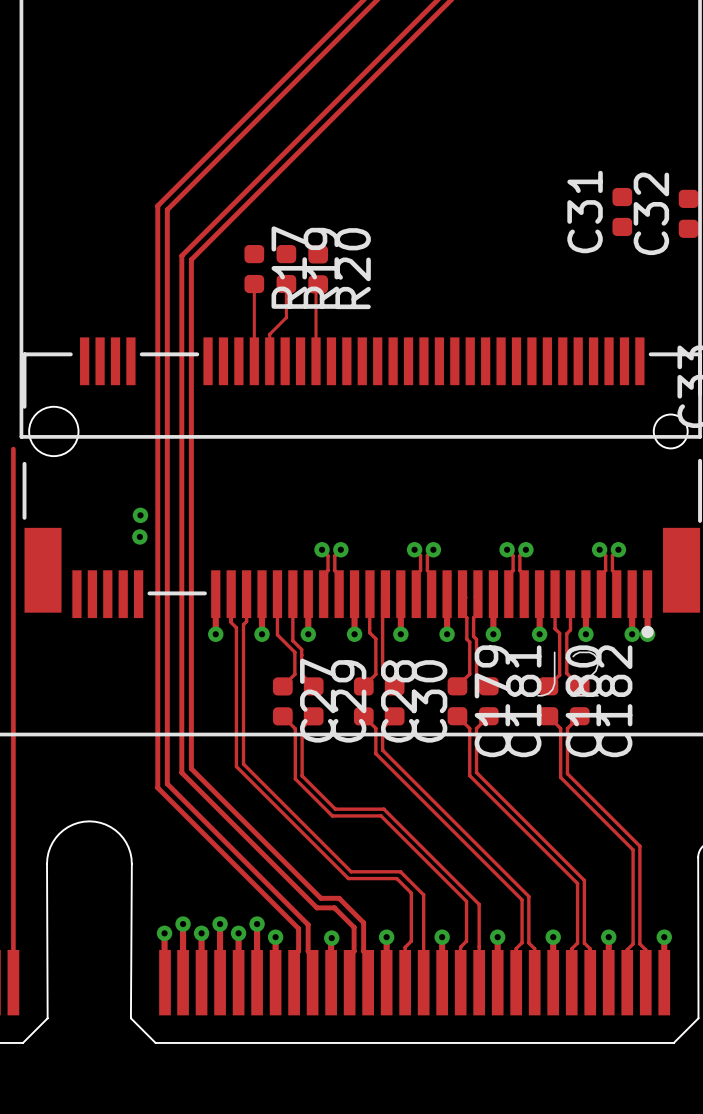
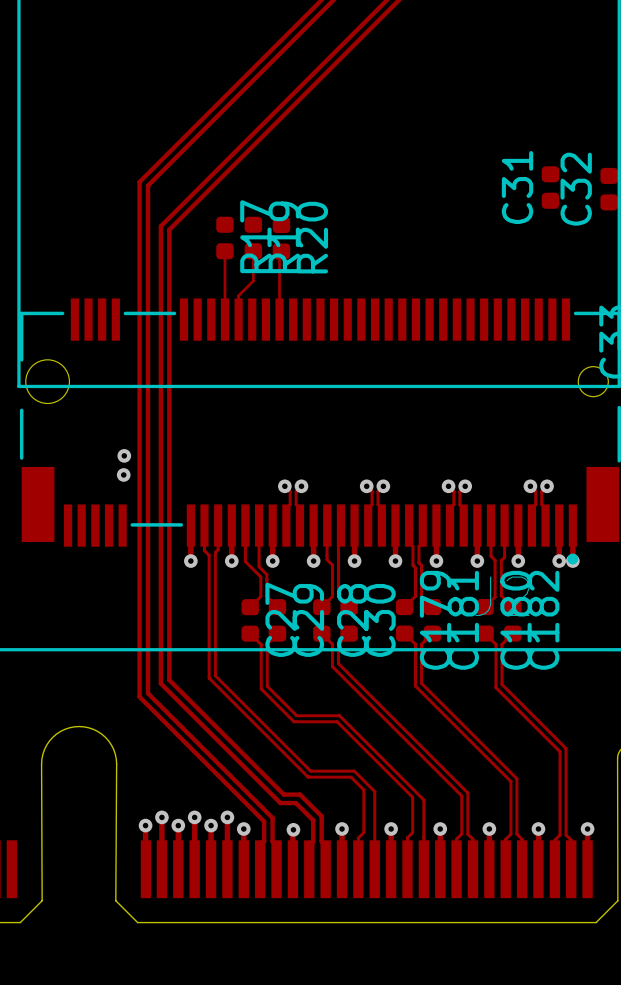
track: (13, 449) (13, 982) -> none

